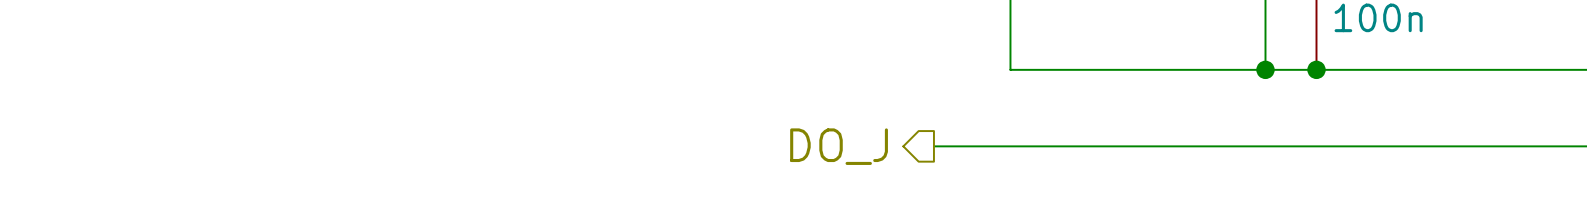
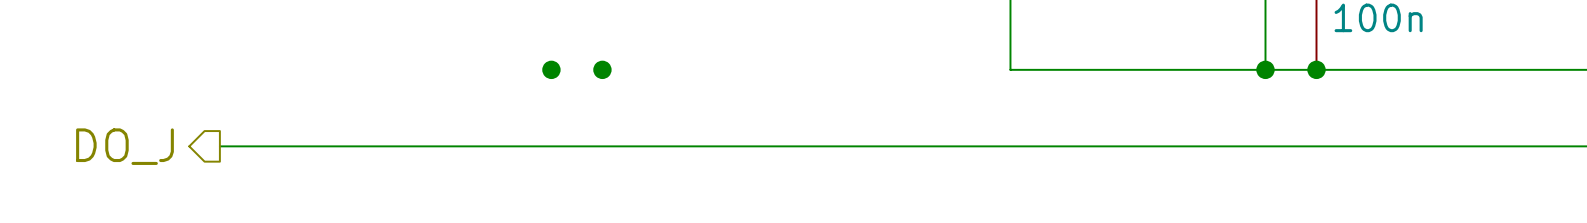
junction: none -> (551, 69)
junction: none -> (602, 69)
hierarchical label: none -> DO_J (124, 146)
wire: none -> (219, 146) (933, 146)
hierarchical label: DO_J (839, 146) -> none

